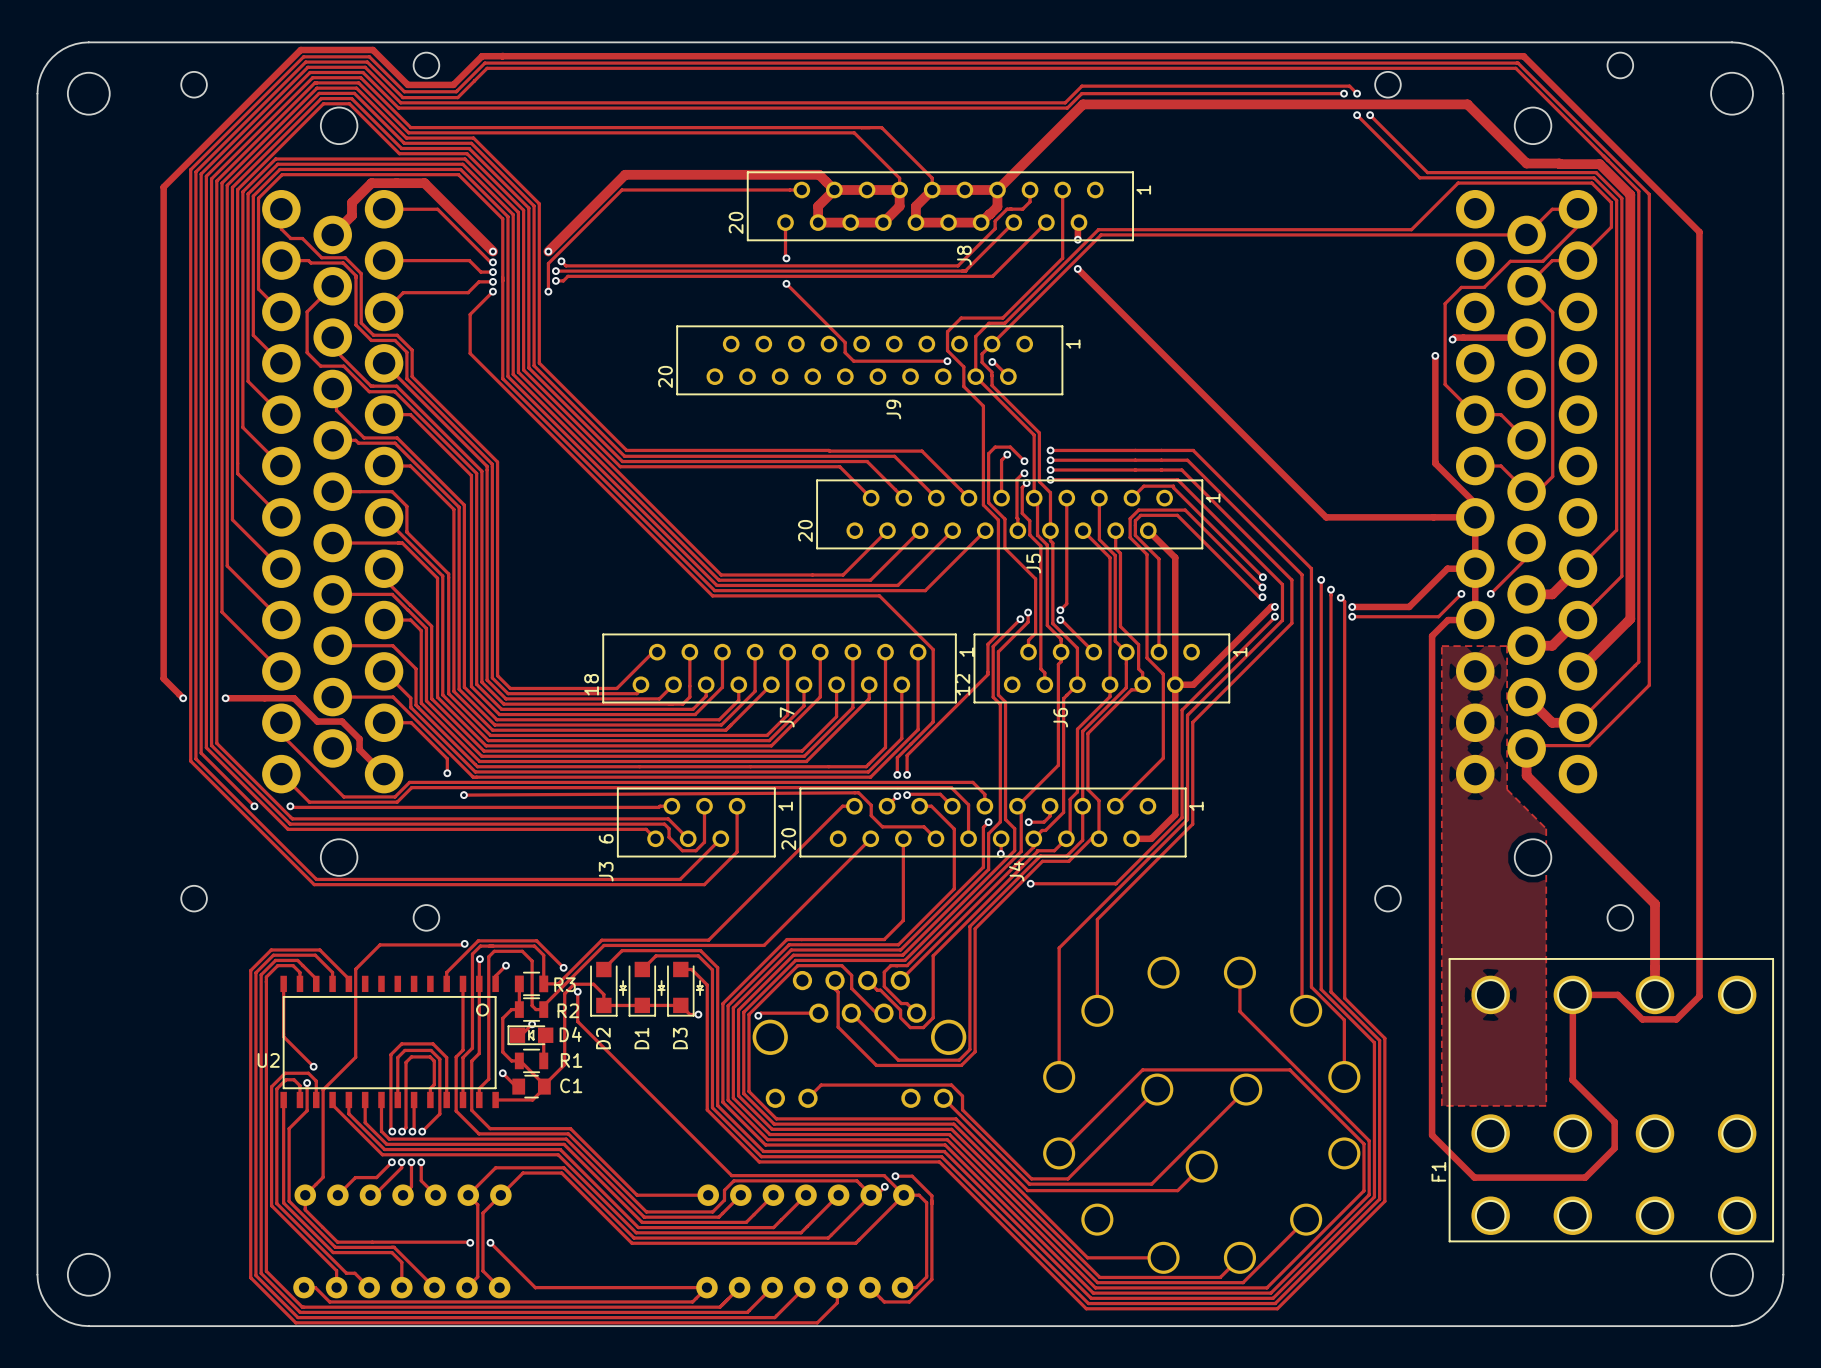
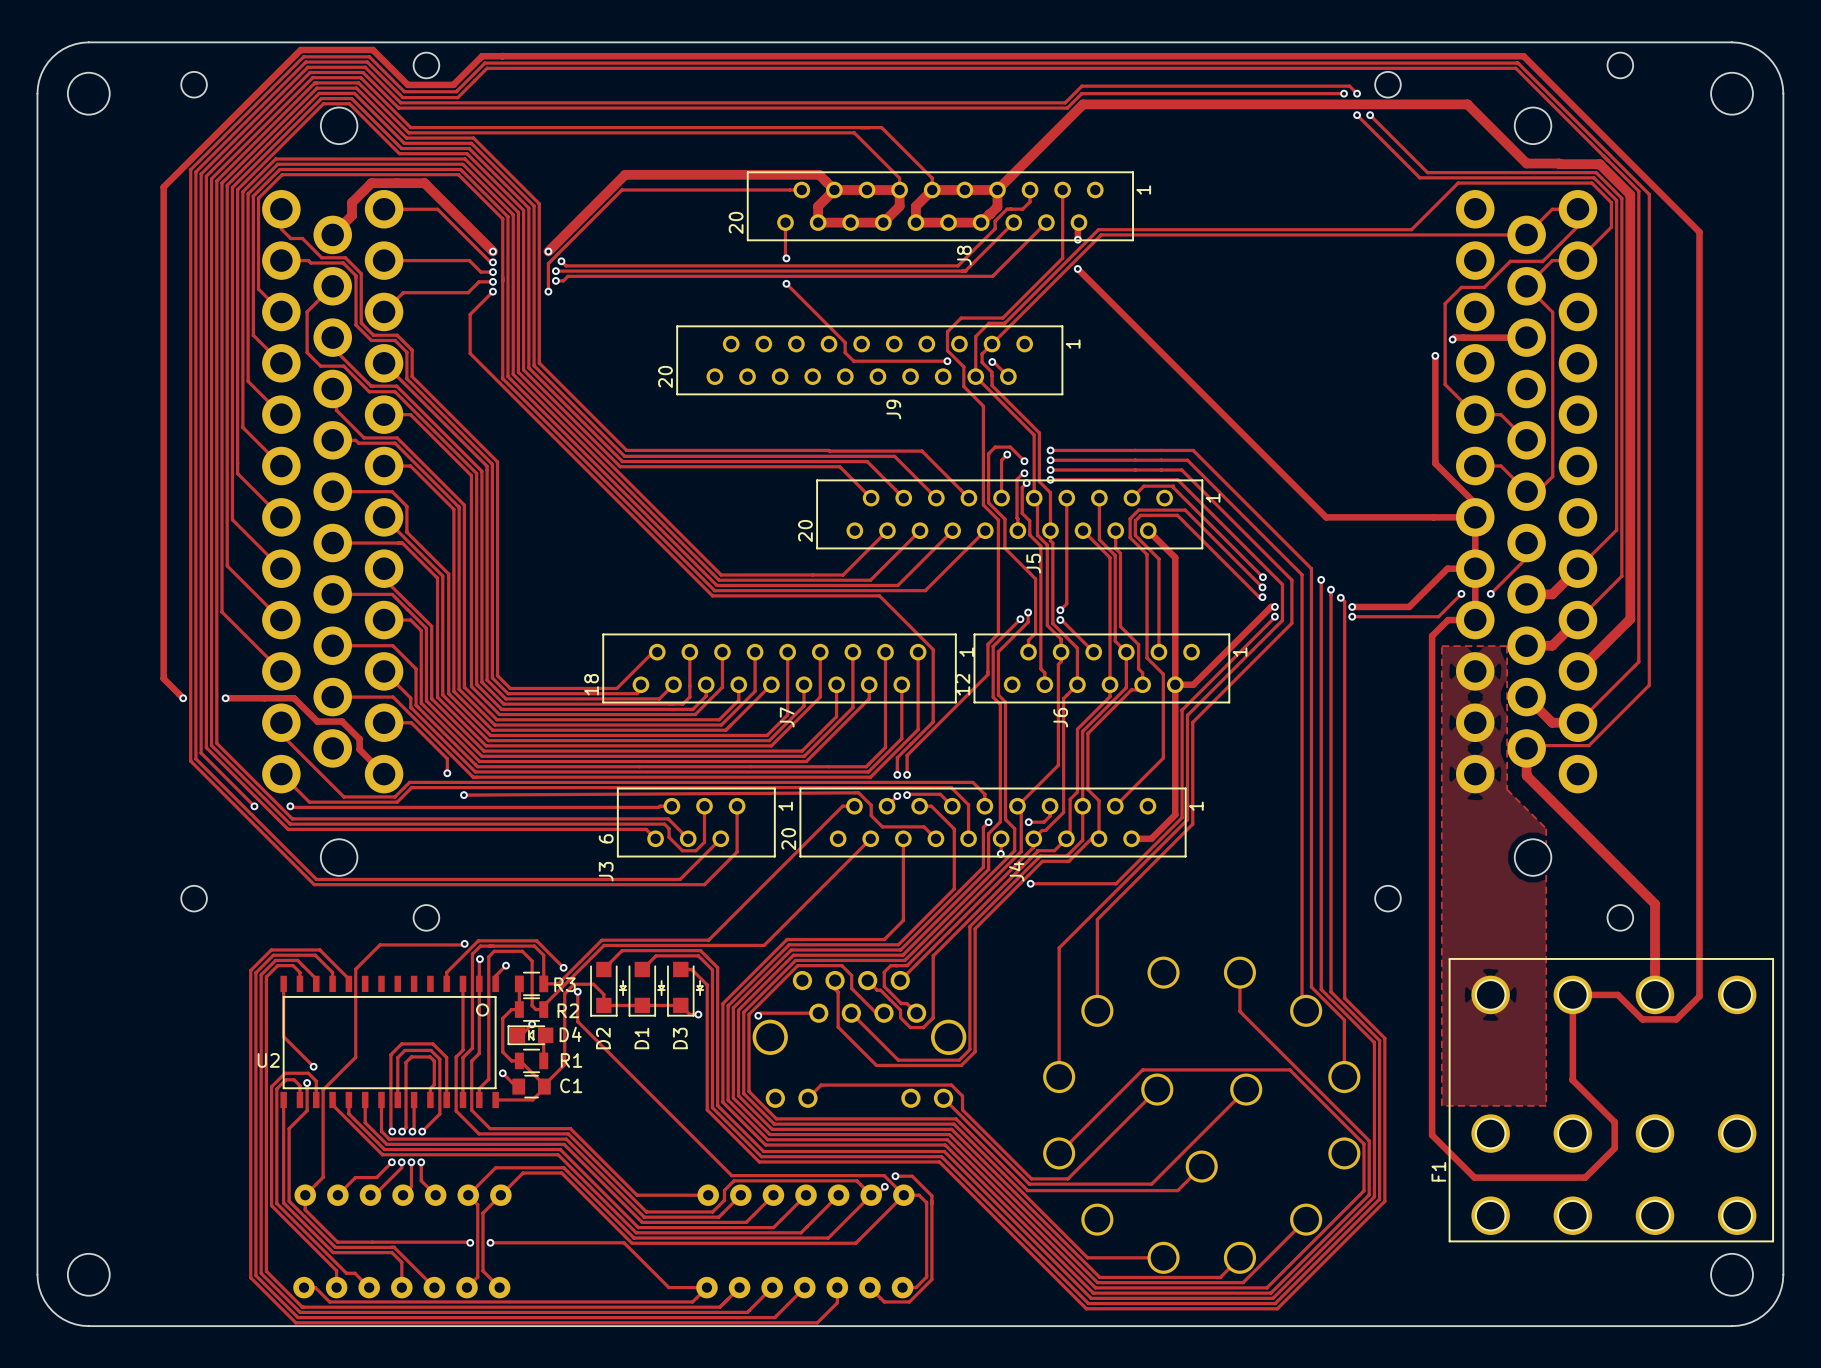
track: (490, 1242) (535, 1287) -> none
track: (535, 1287) (668, 1287) -> (490, 1242) (624, 1242) (668, 1287)

